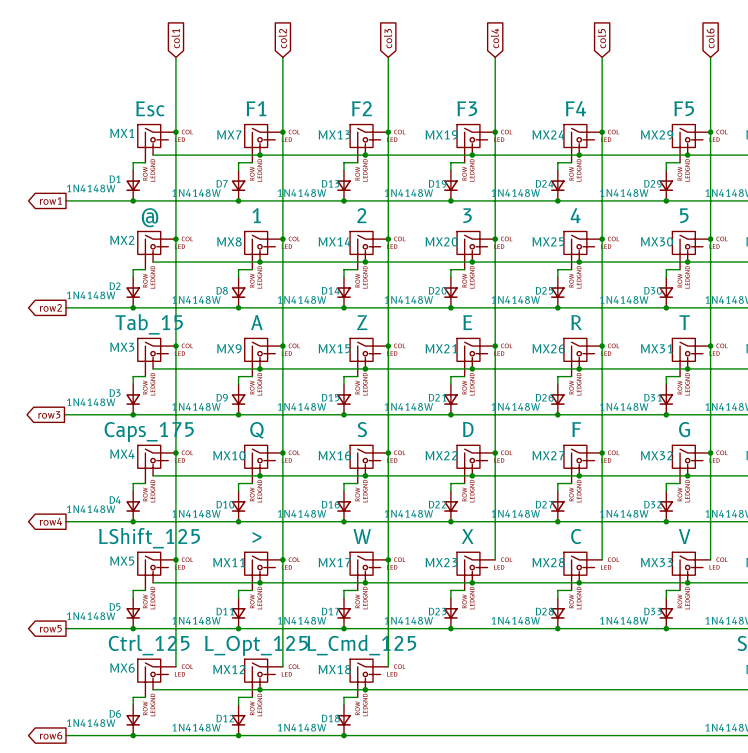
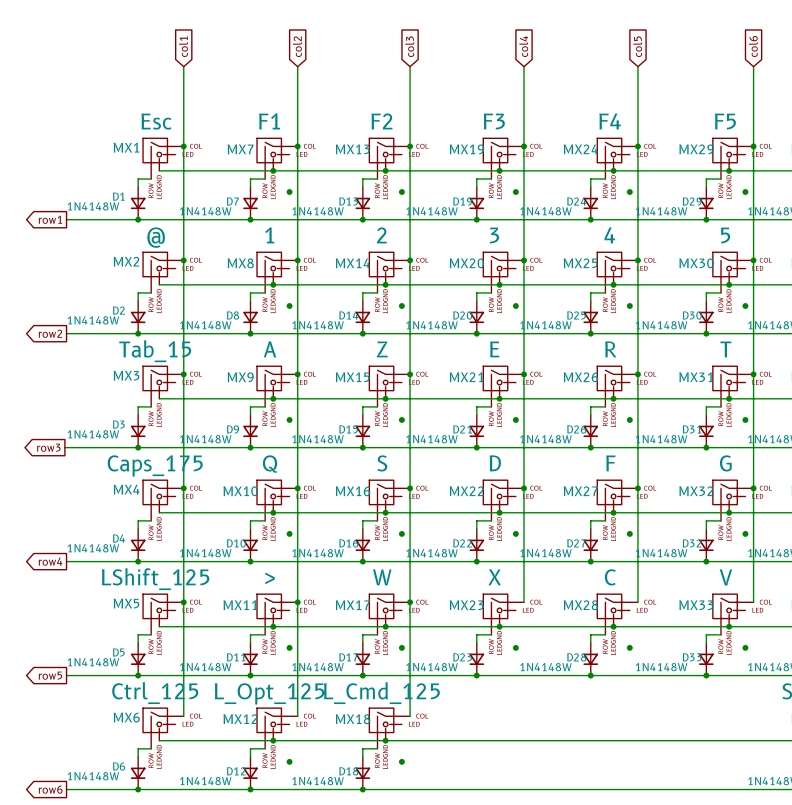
junction: none -> (289, 192)
junction: none -> (401, 192)
junction: none -> (515, 192)
junction: none -> (629, 192)
junction: none -> (745, 192)
junction: none -> (289, 306)
junction: none -> (401, 306)
junction: none -> (515, 306)
junction: none -> (629, 306)
junction: none -> (745, 306)
junction: none -> (289, 419)
junction: none -> (401, 419)
junction: none -> (515, 419)
junction: none -> (629, 419)
junction: none -> (745, 419)
junction: none -> (289, 533)
junction: none -> (401, 533)
junction: none -> (515, 533)
junction: none -> (629, 533)
junction: none -> (745, 533)
junction: none -> (289, 647)
junction: none -> (401, 647)
junction: none -> (515, 647)
junction: none -> (629, 647)
junction: none -> (745, 647)
junction: none -> (289, 761)
junction: none -> (401, 761)

